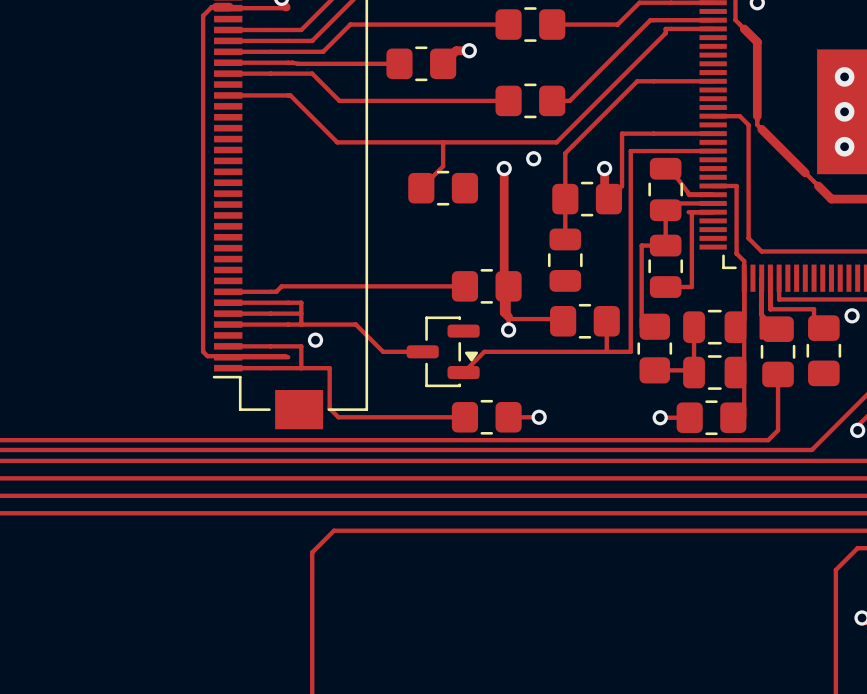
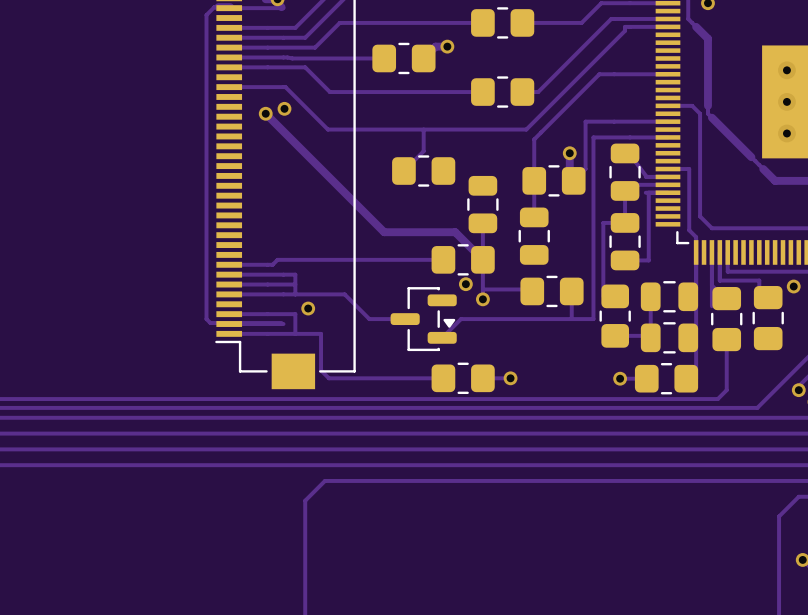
via: none -> (284, 108)
track: none -> (265, 113) (384, 232) (455, 232) (482, 259) (482, 223)
via: none -> (265, 113)
via: (533, 158) -> none
track: (504, 168) (504, 312) (508, 316) -> none
via: (504, 168) -> none
part: none -> (482, 204)
via: none -> (465, 284)

